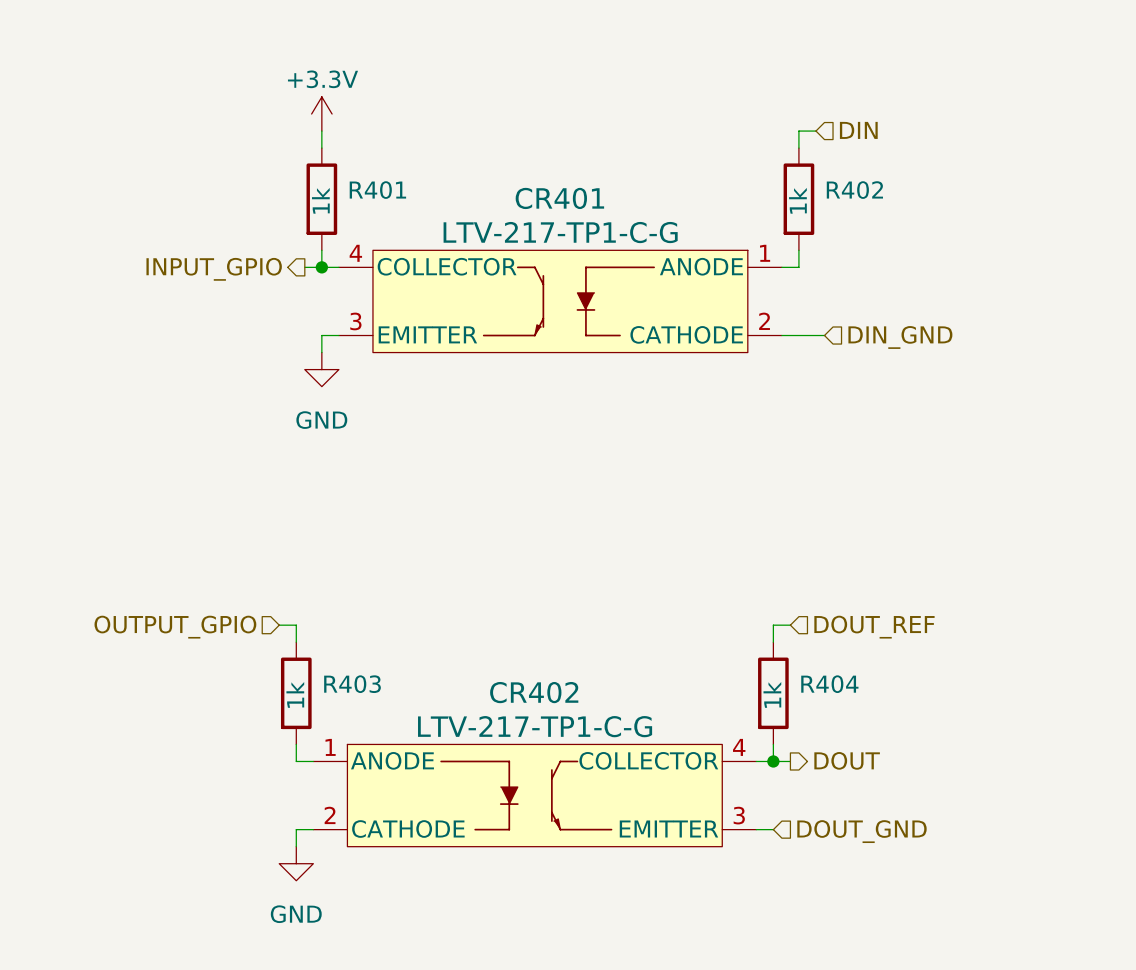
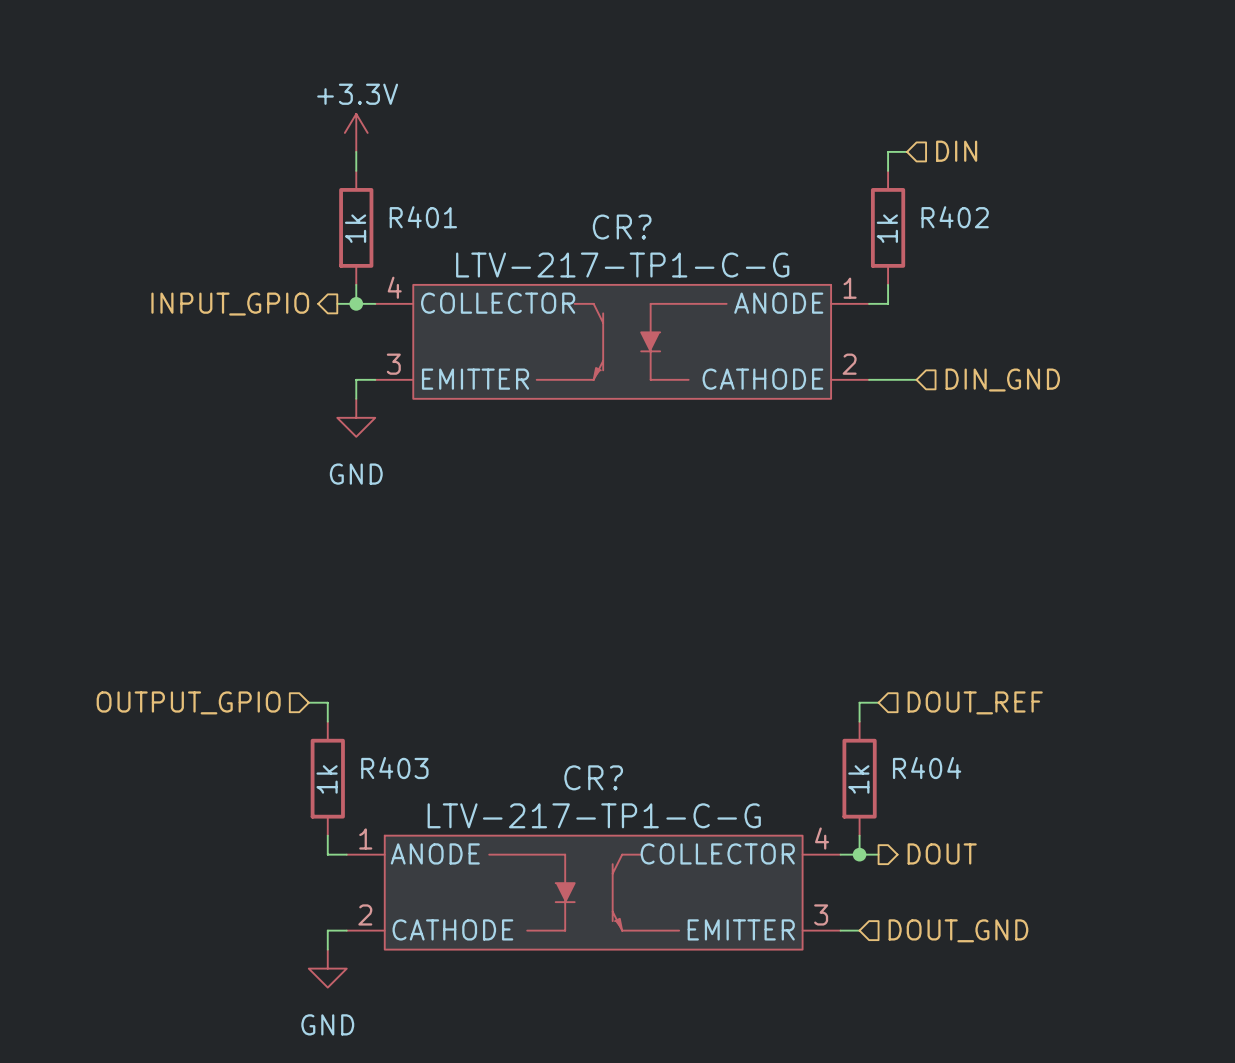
CR401 name: CR401 (559, 198) -> CR? (622, 227)
CR402 name: CR402 (534, 692) -> CR? (593, 777)

